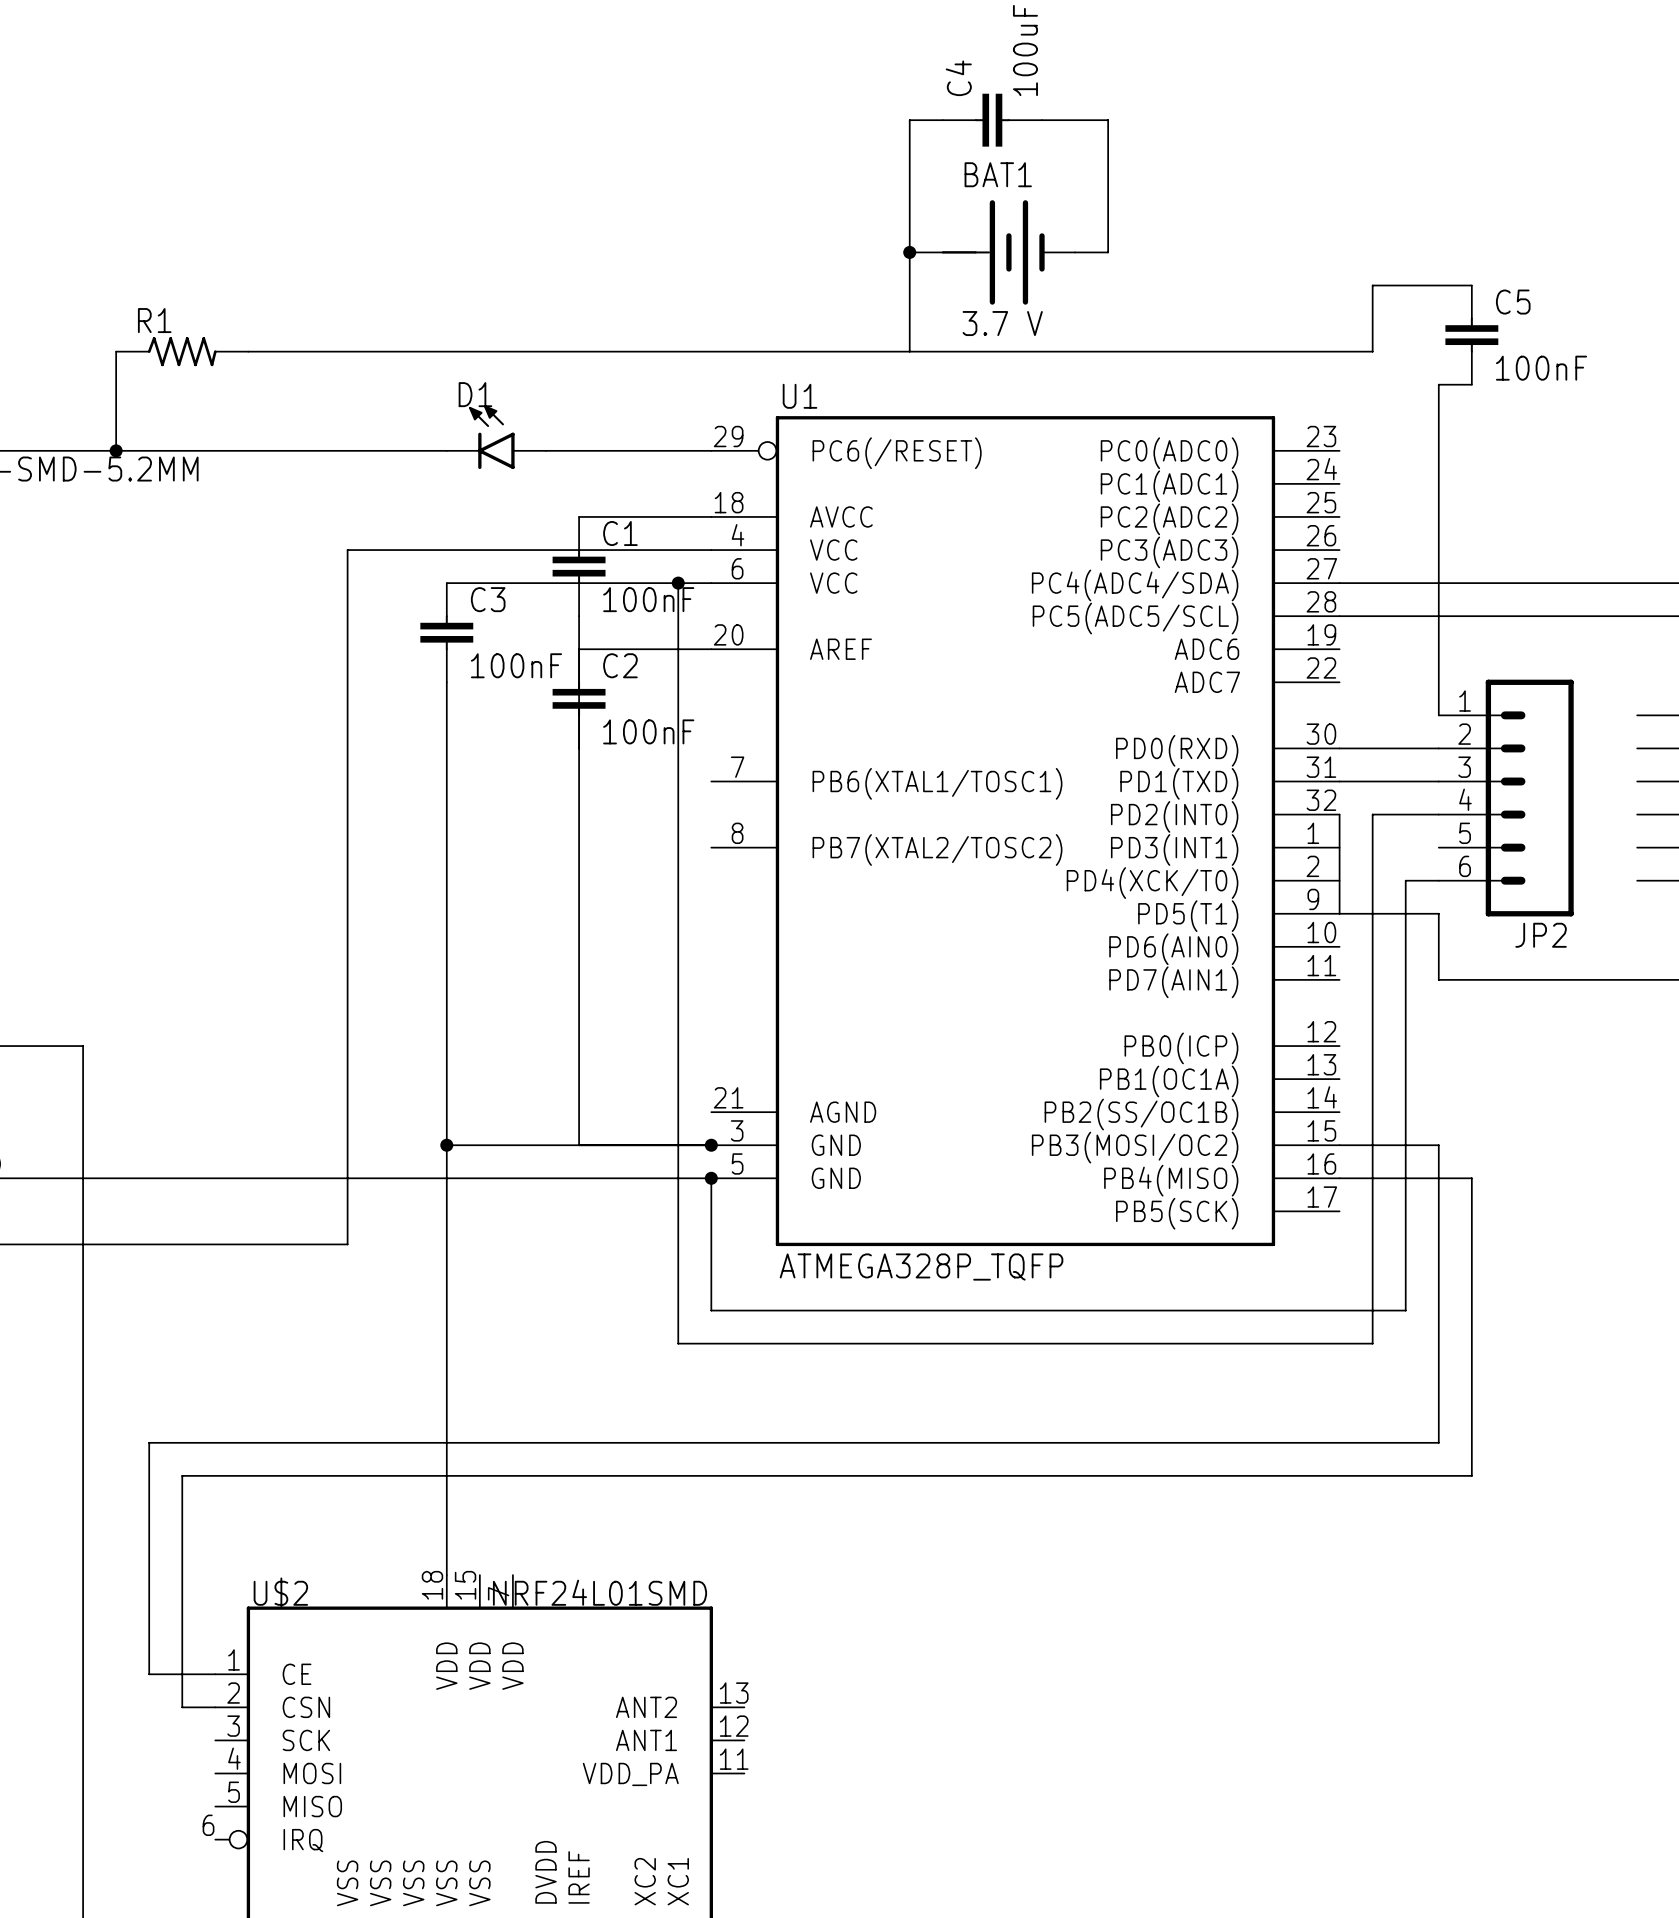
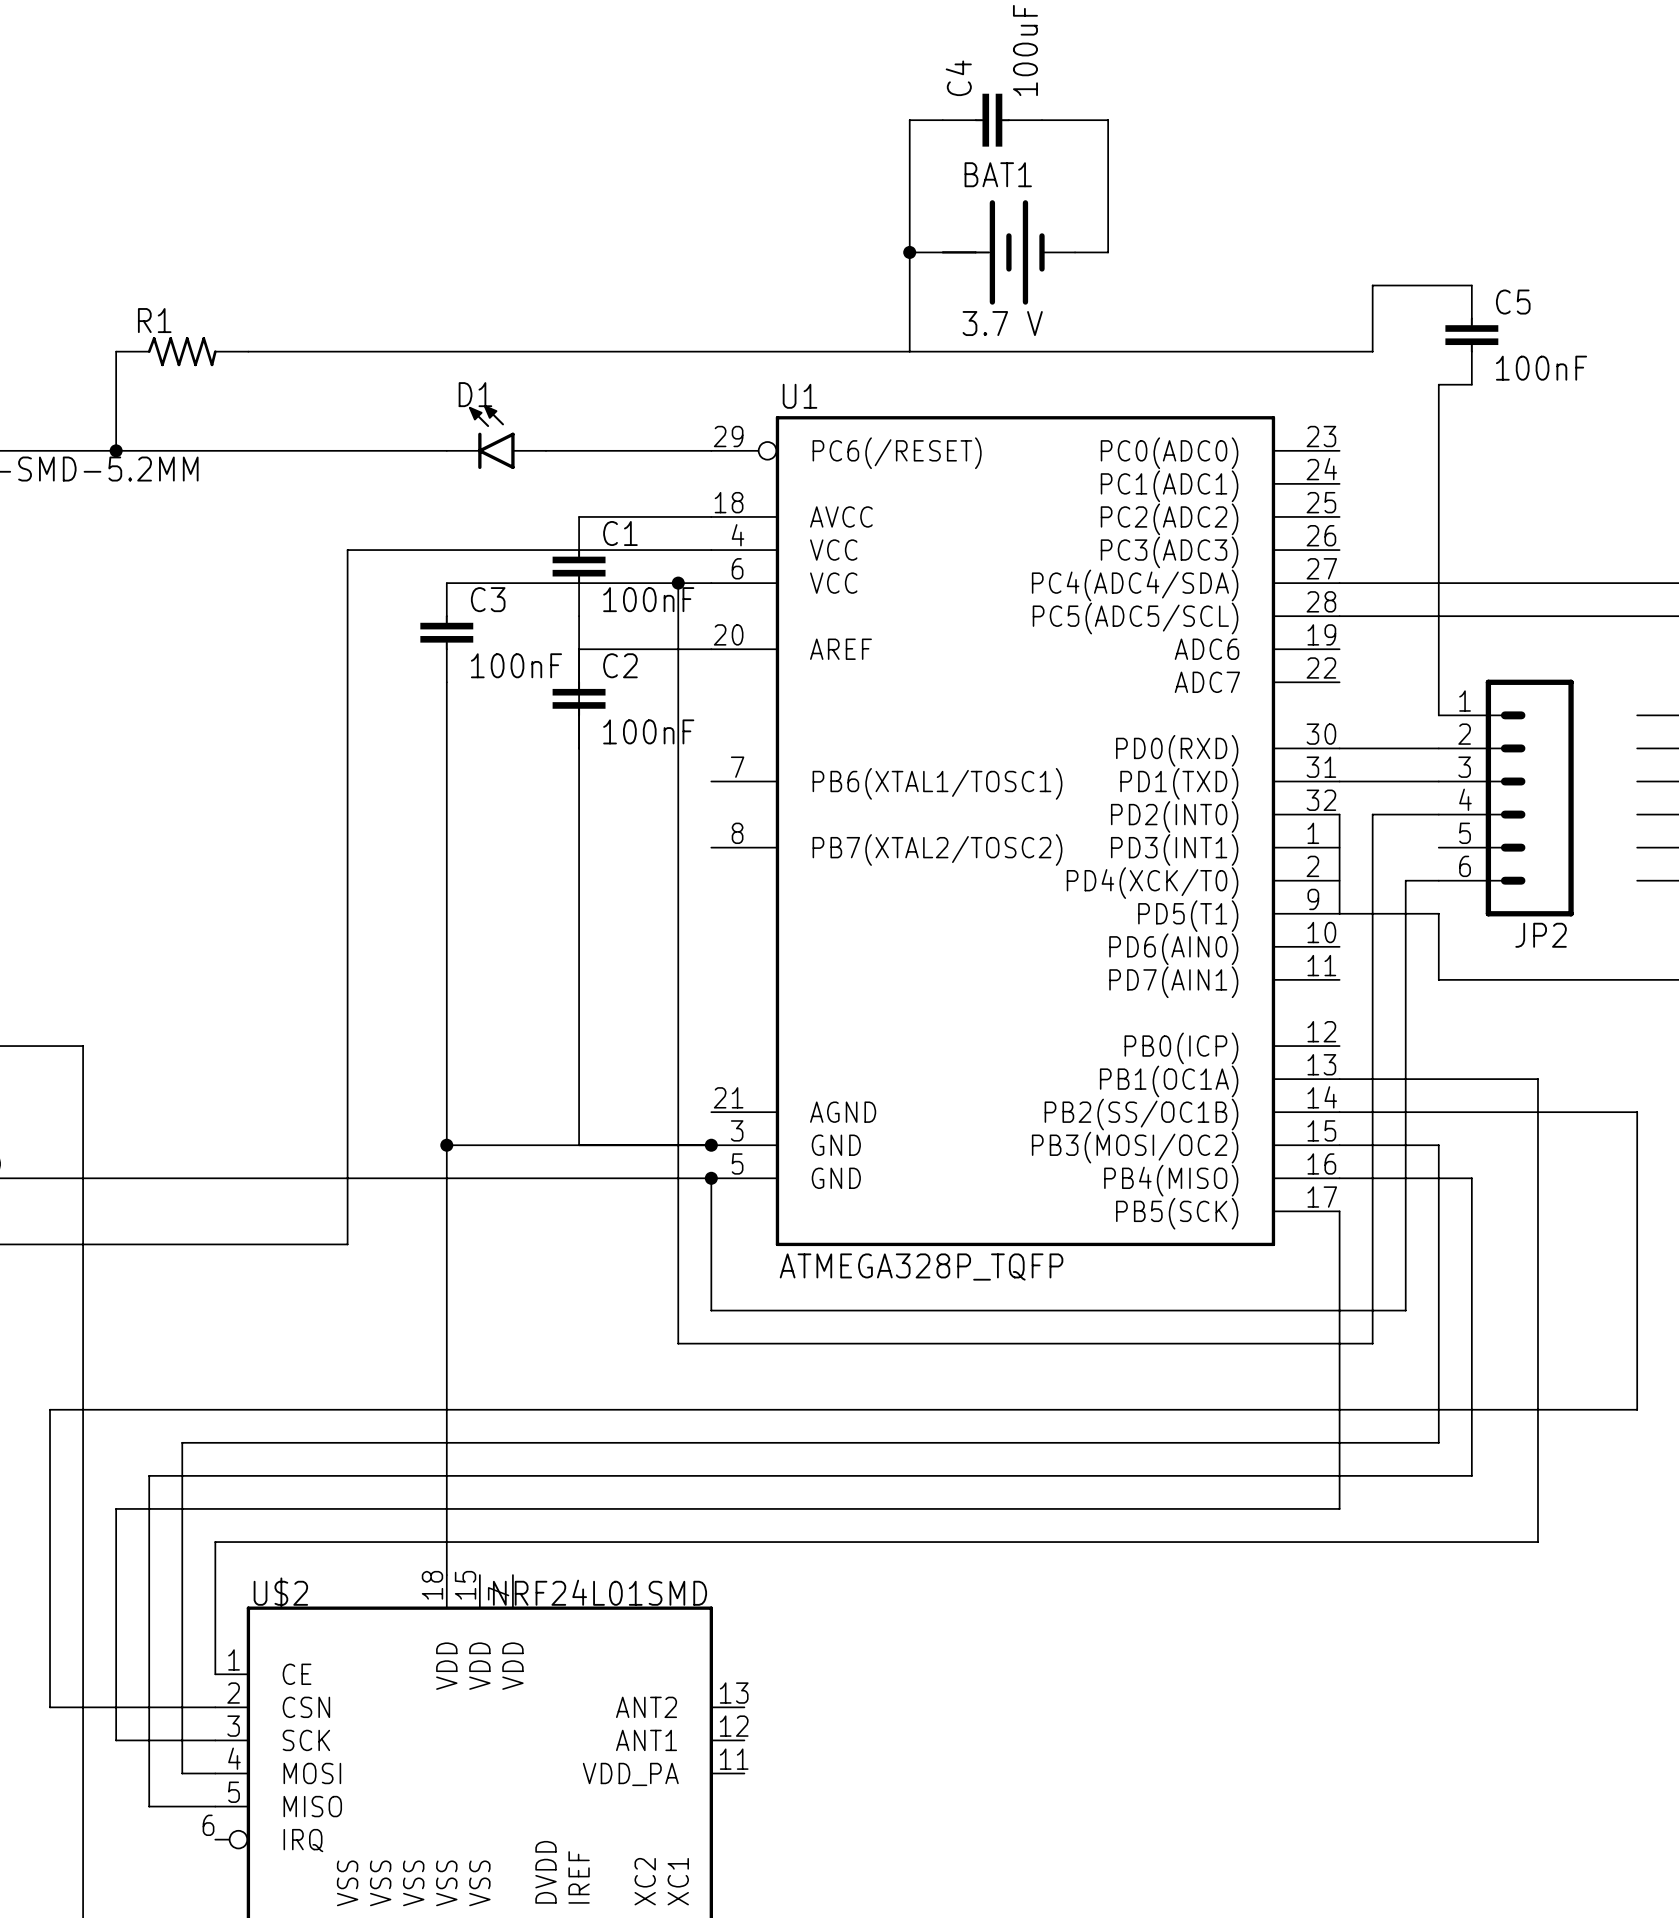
wire: none -> (1339, 1079) (1537, 1079) (1537, 1542) (215, 1542) (215, 1674)
wire: none -> (1339, 1112) (1637, 1112) (1637, 1409) (50, 1409) (50, 1707) (182, 1707) (182, 1773) (215, 1773)
wire: none -> (1339, 1211) (1339, 1508) (116, 1508) (116, 1740) (215, 1740)
wire: (182, 1442) (149, 1442) (149, 1475) -> (182, 1442) (182, 1475) (149, 1475)
wire: (149, 1674) (215, 1674) -> (149, 1674) (149, 1806) (215, 1806)

